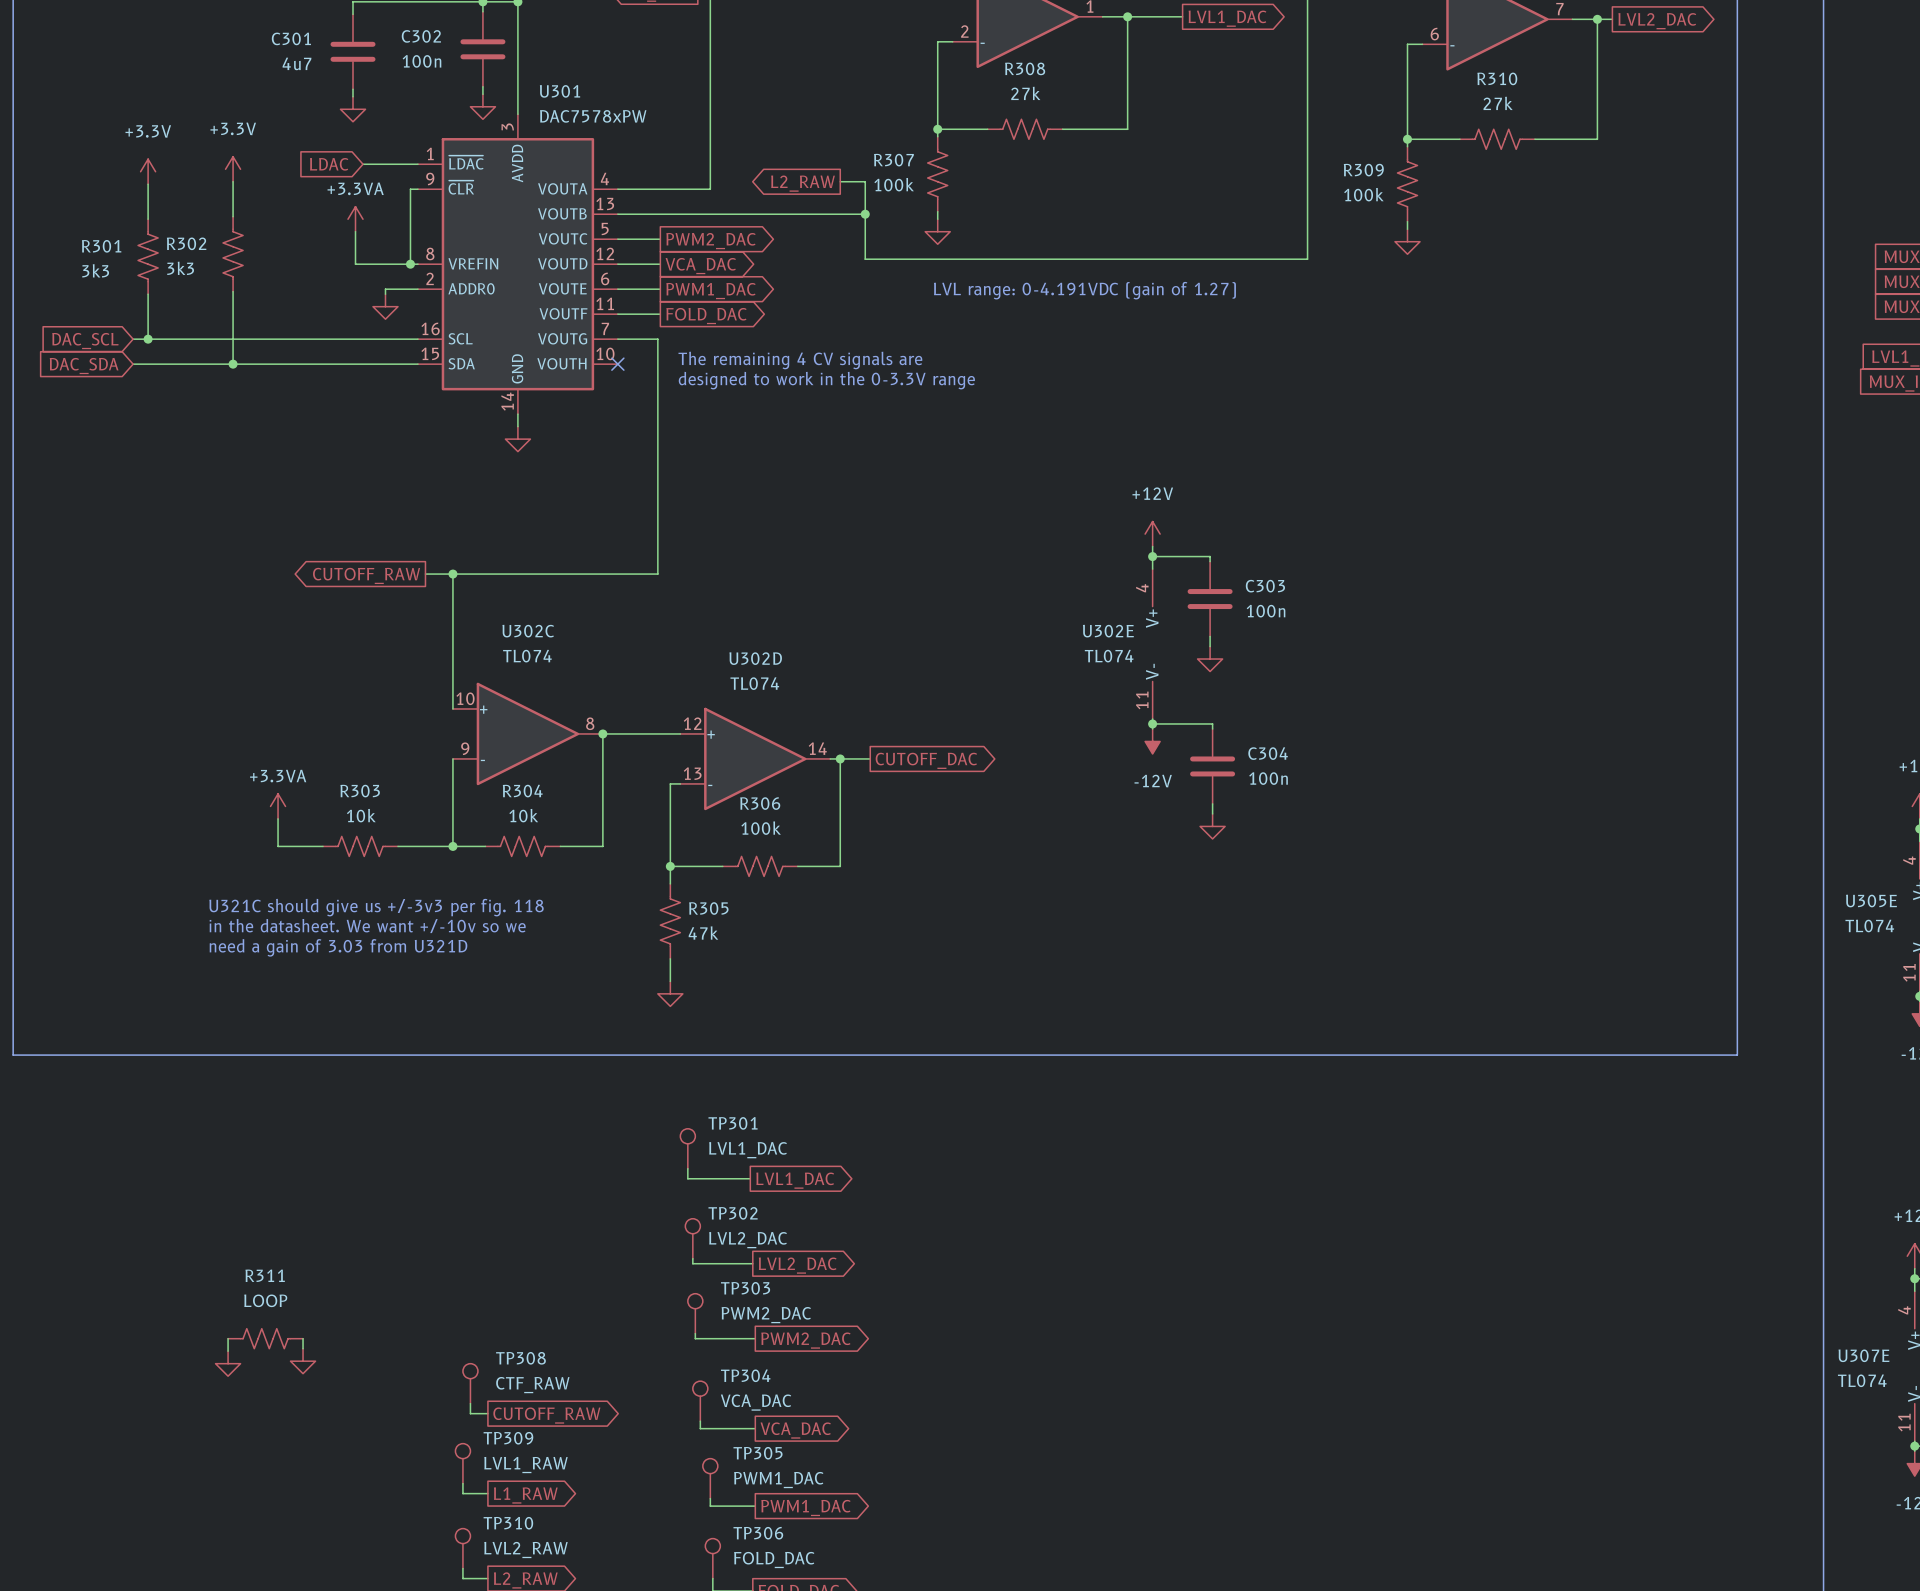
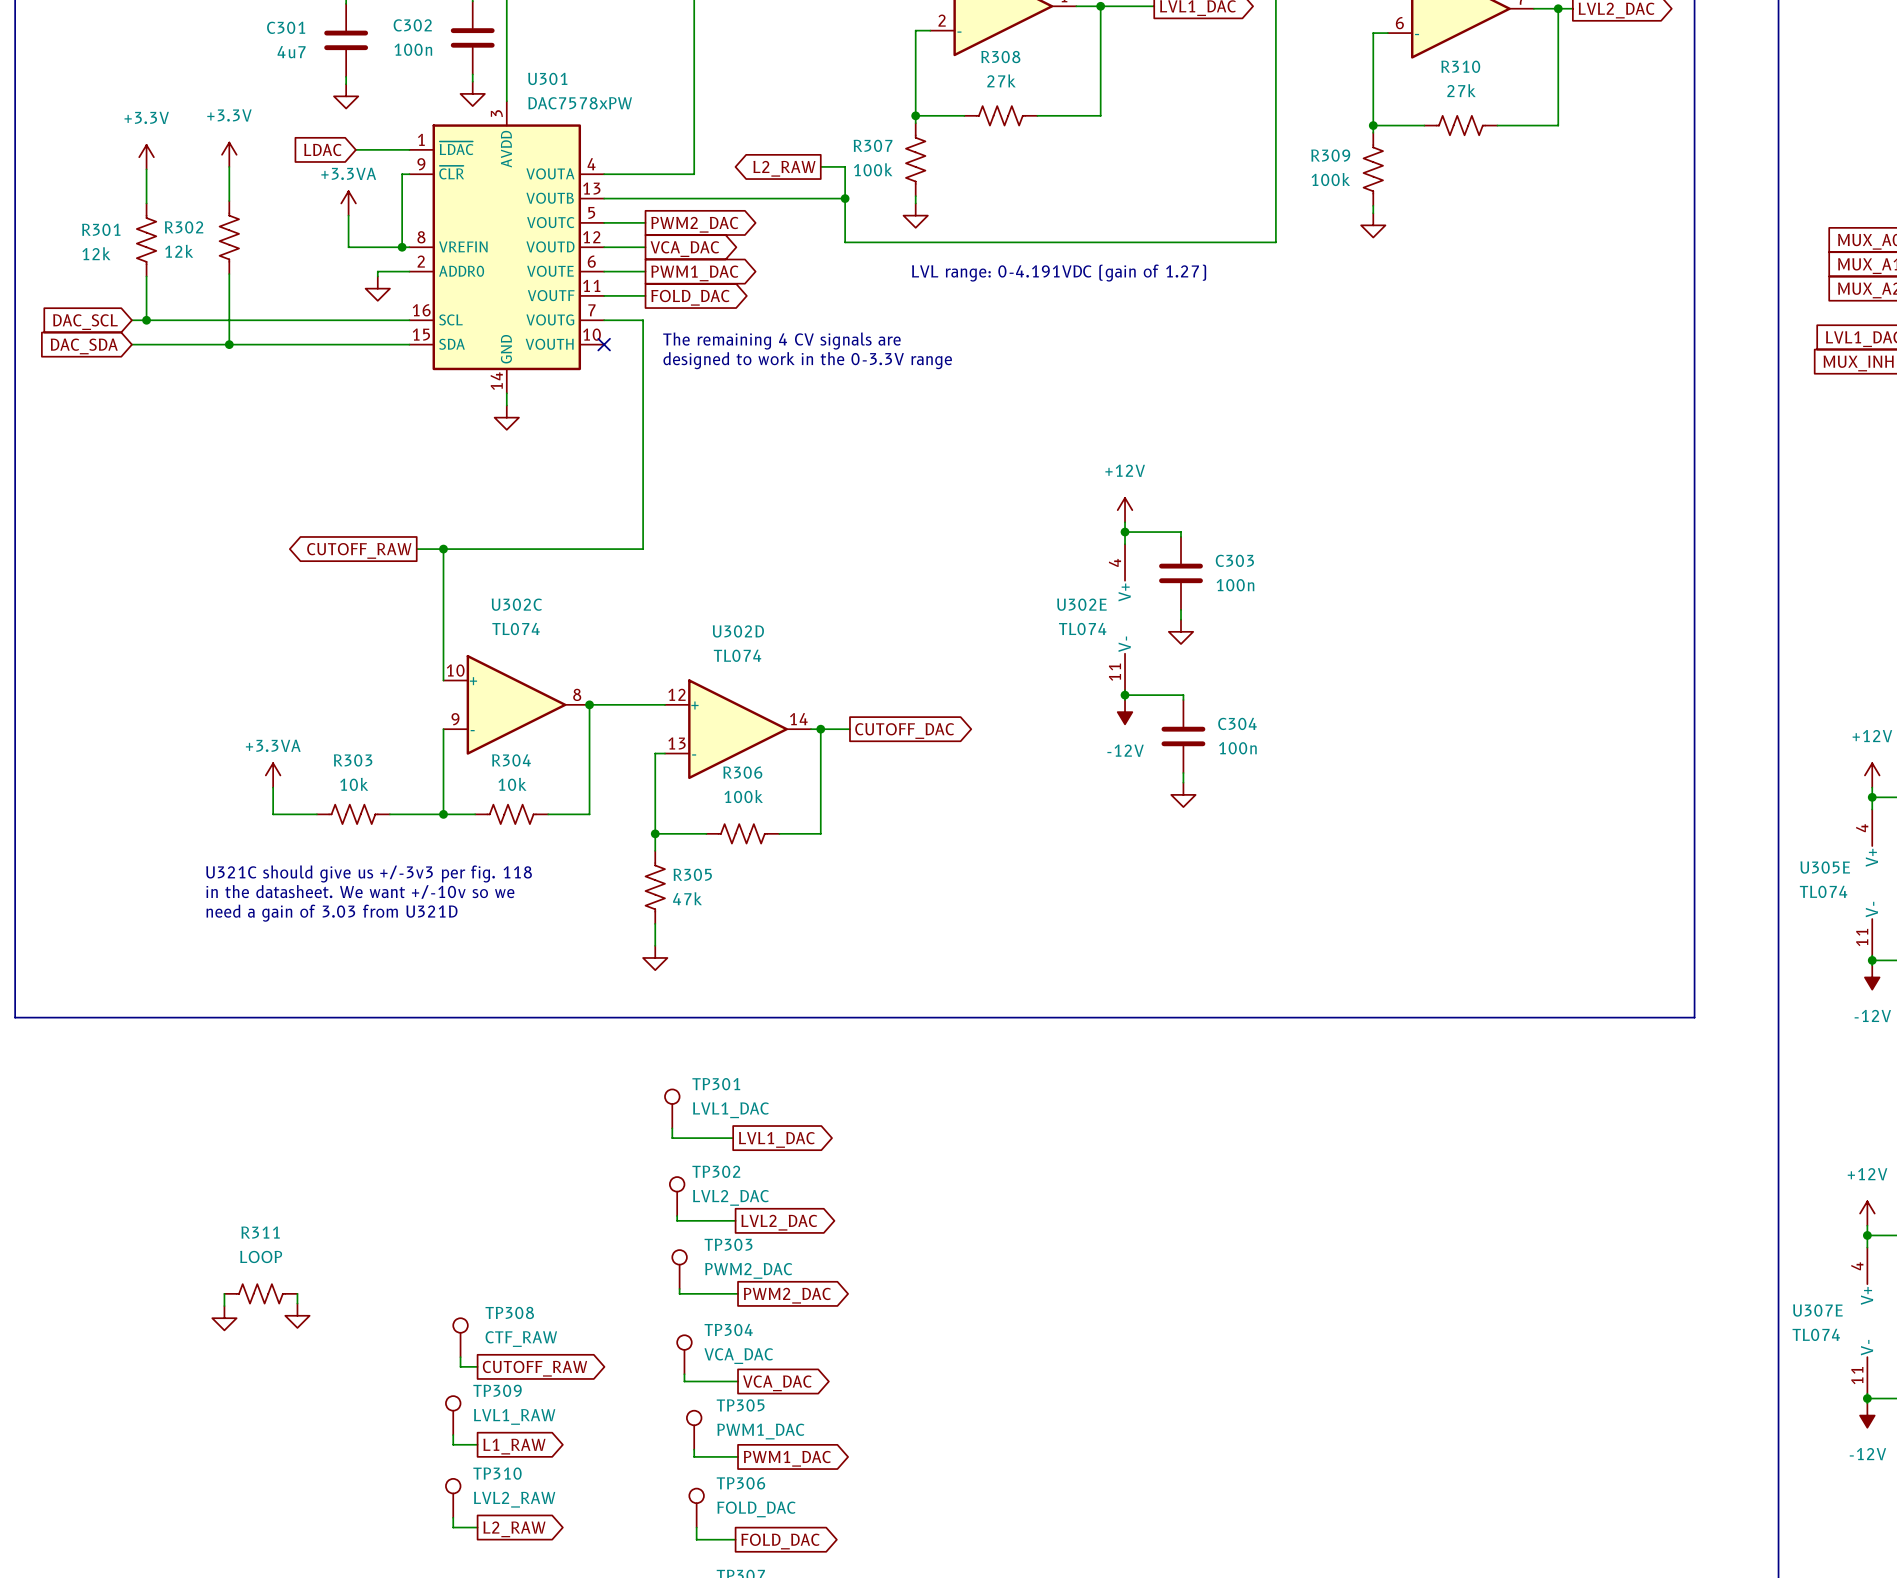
R302 value: 3k3 (180, 268) -> 12k (179, 251)
R301 value: 3k3 (95, 270) -> 12k (96, 253)

